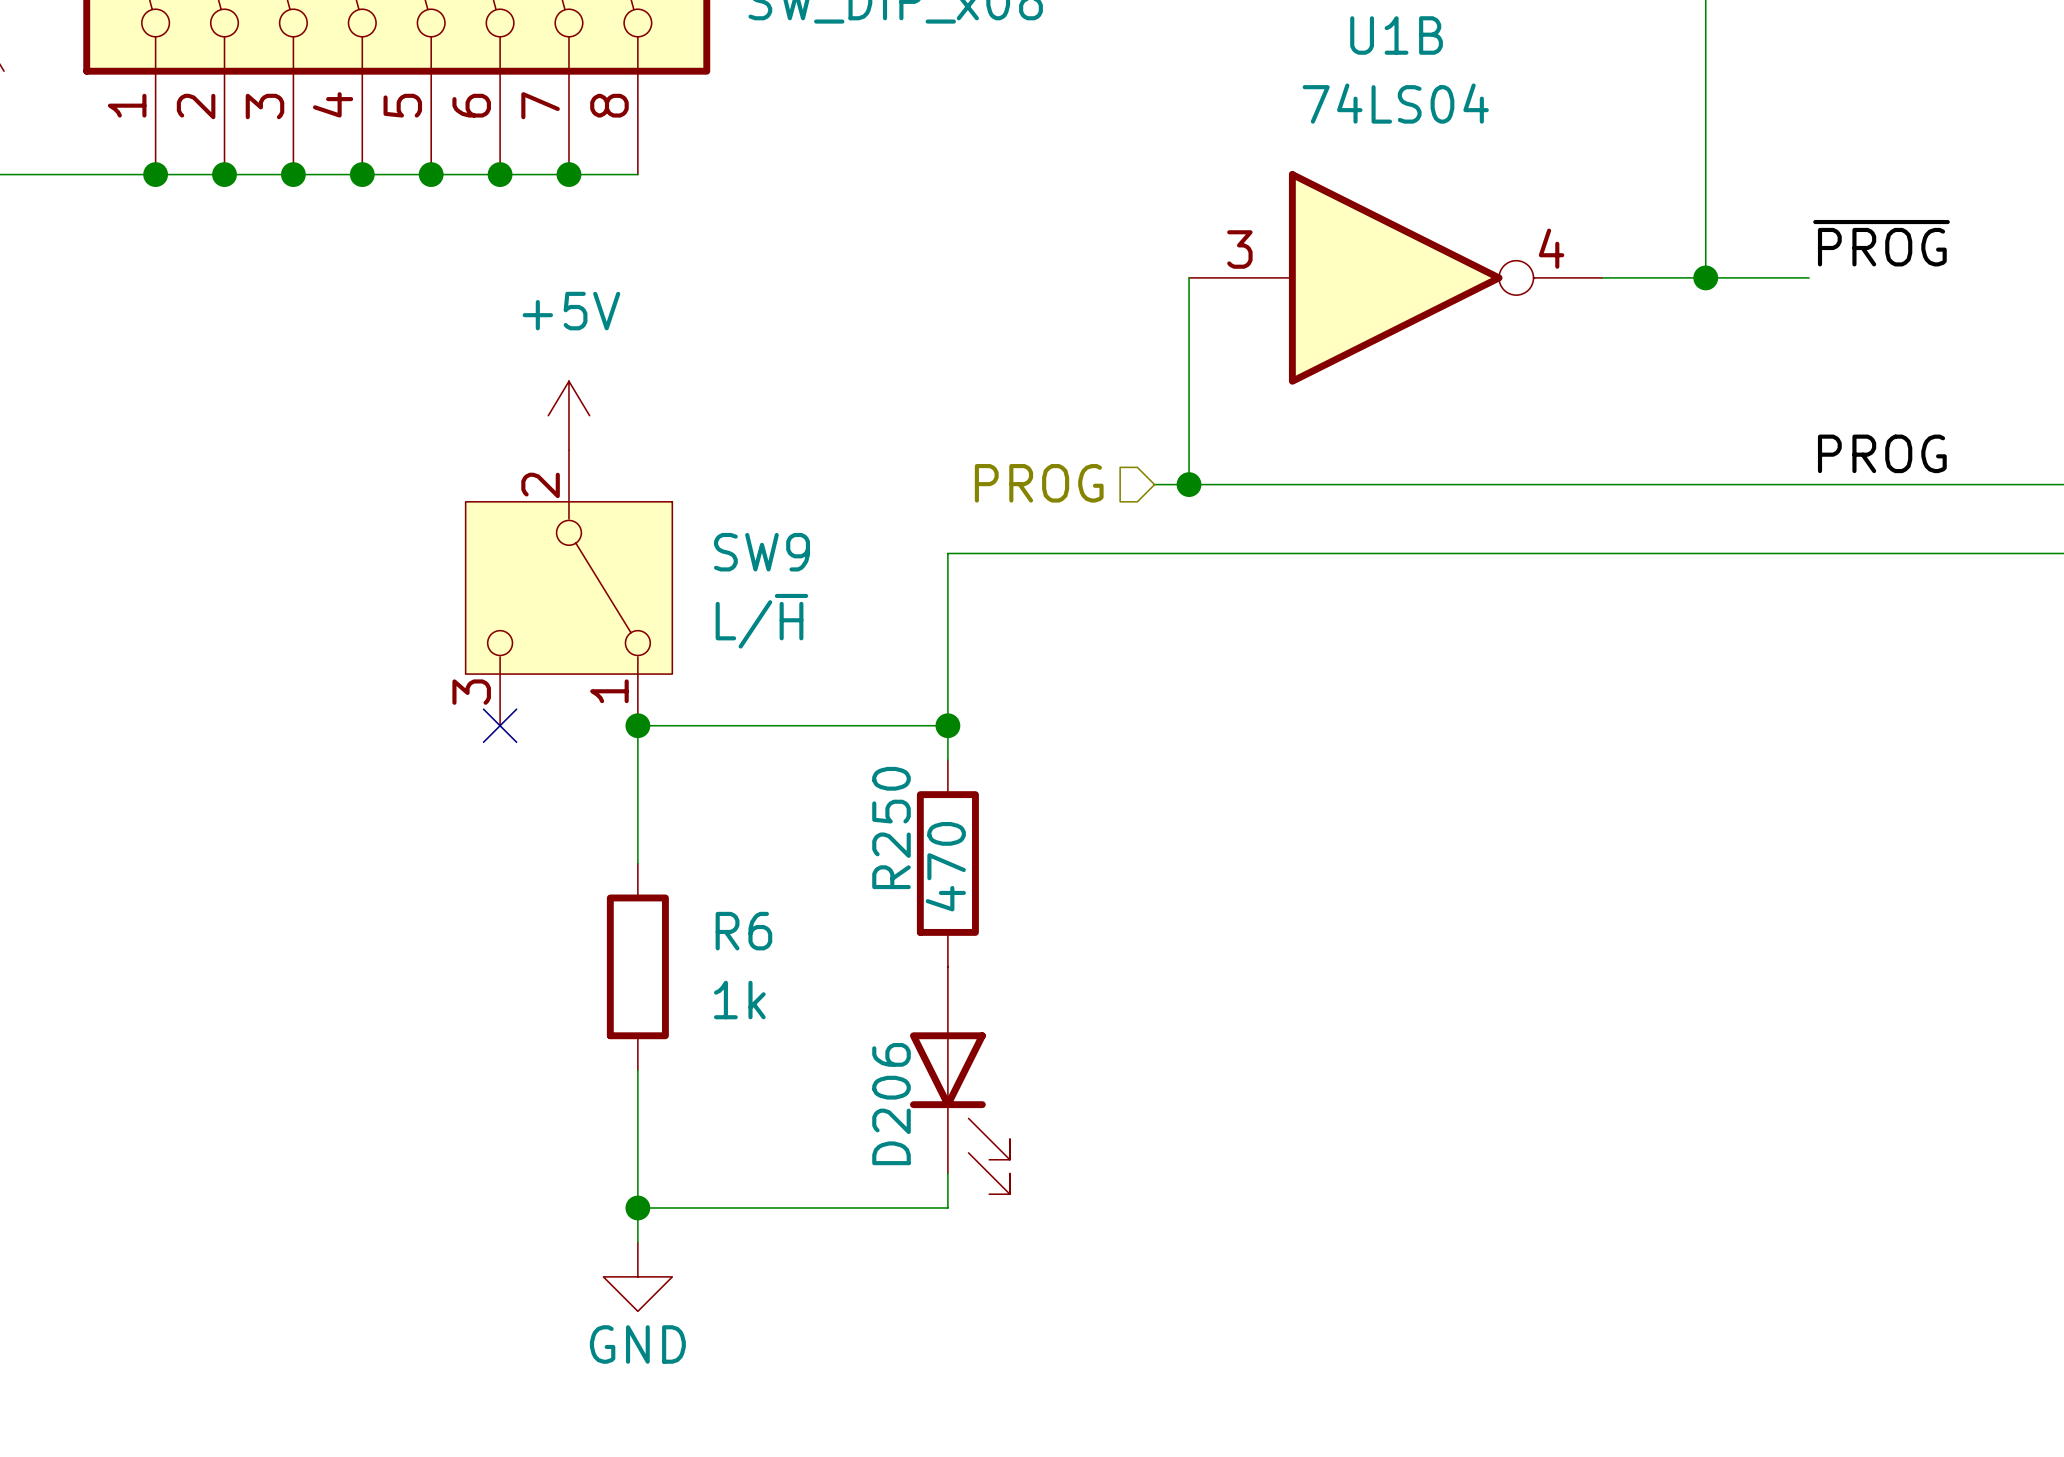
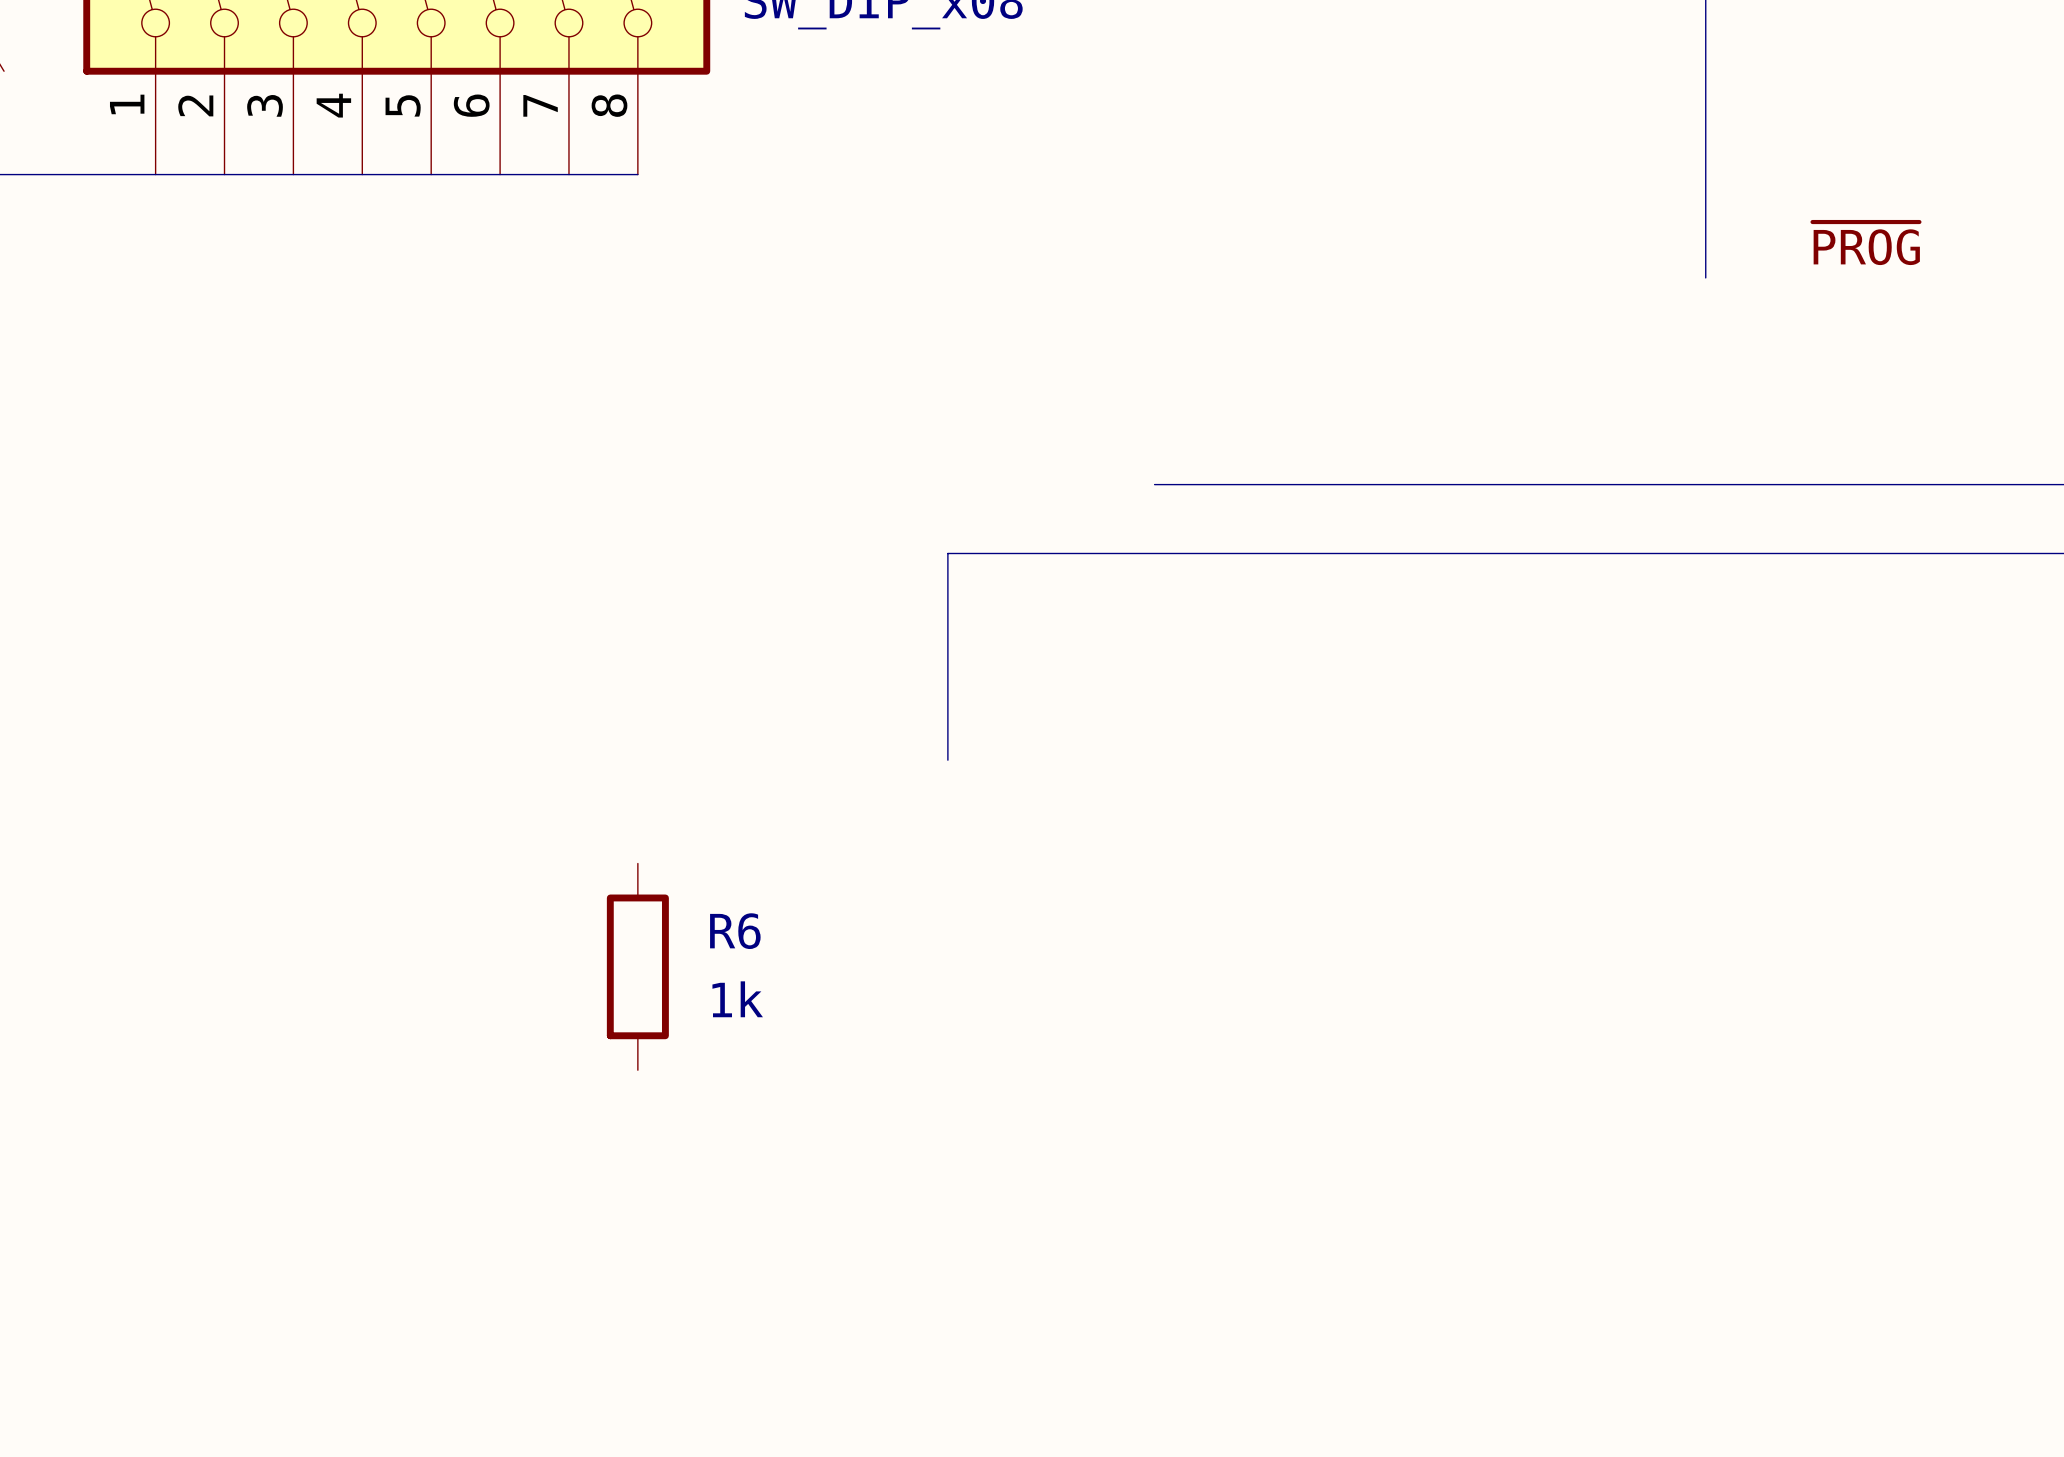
junction: (155, 174) -> none
junction: (224, 174) -> none
junction: (293, 174) -> none
junction: (362, 174) -> none
junction: (431, 174) -> none
junction: (500, 174) -> none
junction: (568, 174) -> none
wire: (1189, 277) (1189, 484) -> none
U1B: 74LS04 (1395, 277) -> none
wire: (1602, 277) (1809, 277) -> none
junction: (1705, 277) -> none
power symbol: +5V (568, 415) -> none
label: PROG (1882, 453) -> none
hierarchical label: PROG (1039, 483) -> none
junction: (1189, 484) -> none
SW9: L/~{H} (568, 587) -> none
no-connect mark: (500, 725) -> none
junction: (637, 725) -> none
wire: (947, 725) (637, 725) (637, 863) -> none
junction: (947, 725) -> none
R250: 470 (947, 863) -> none
wire: (637, 1070) (637, 1242) -> none
D206: (959, 1080) -> none
wire: (947, 1173) (947, 1207) (637, 1207) -> none
junction: (637, 1207) -> none
power symbol: GND (637, 1276) -> none

